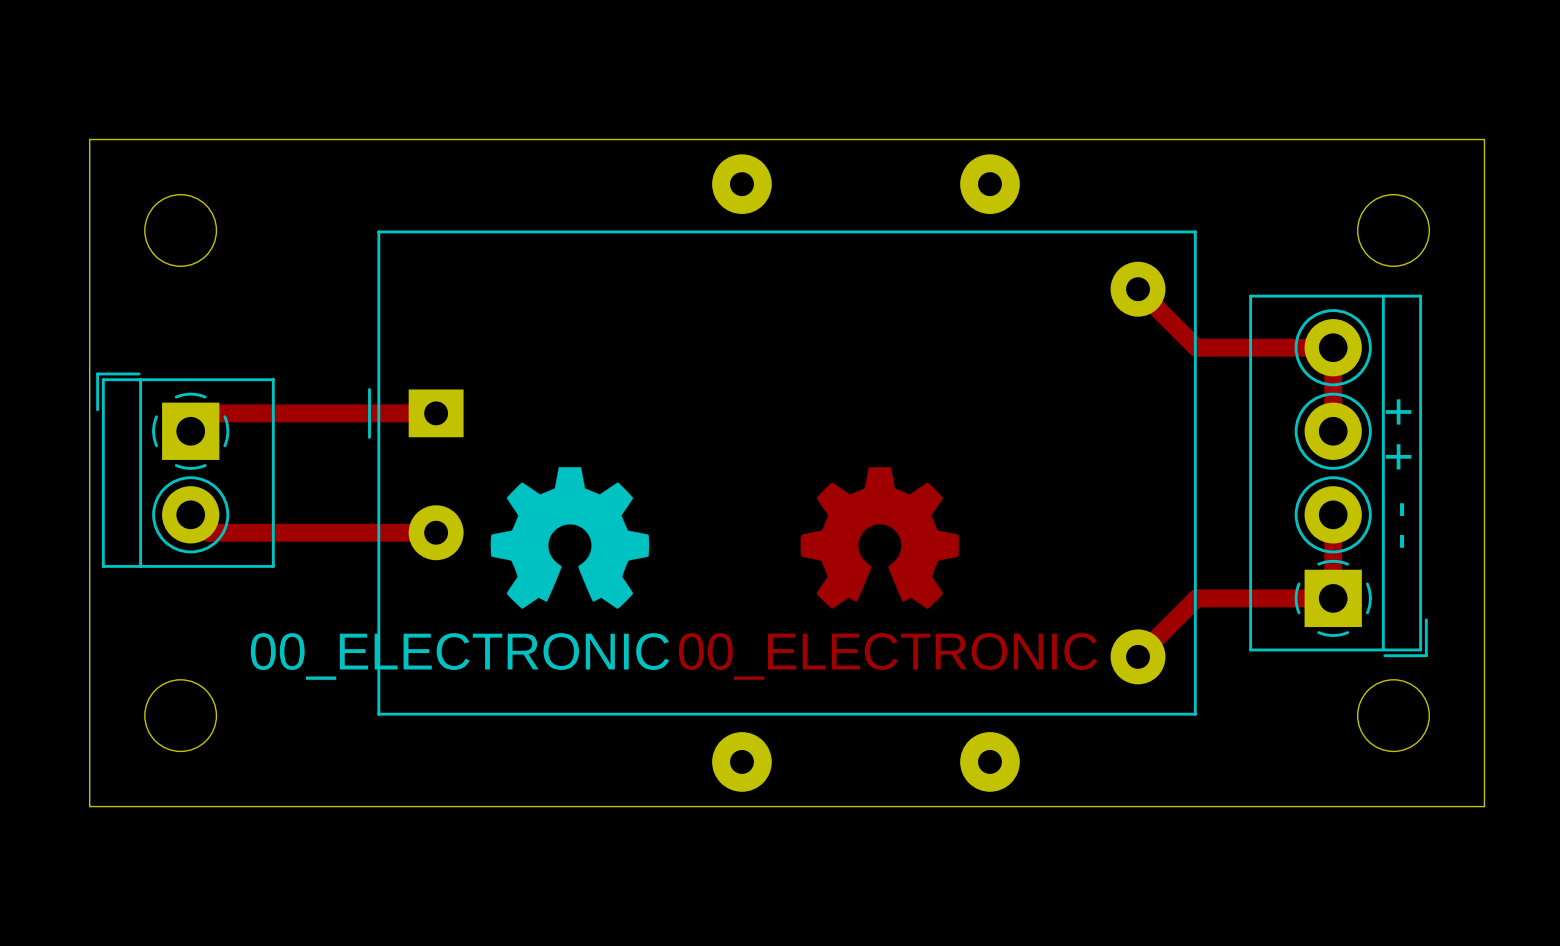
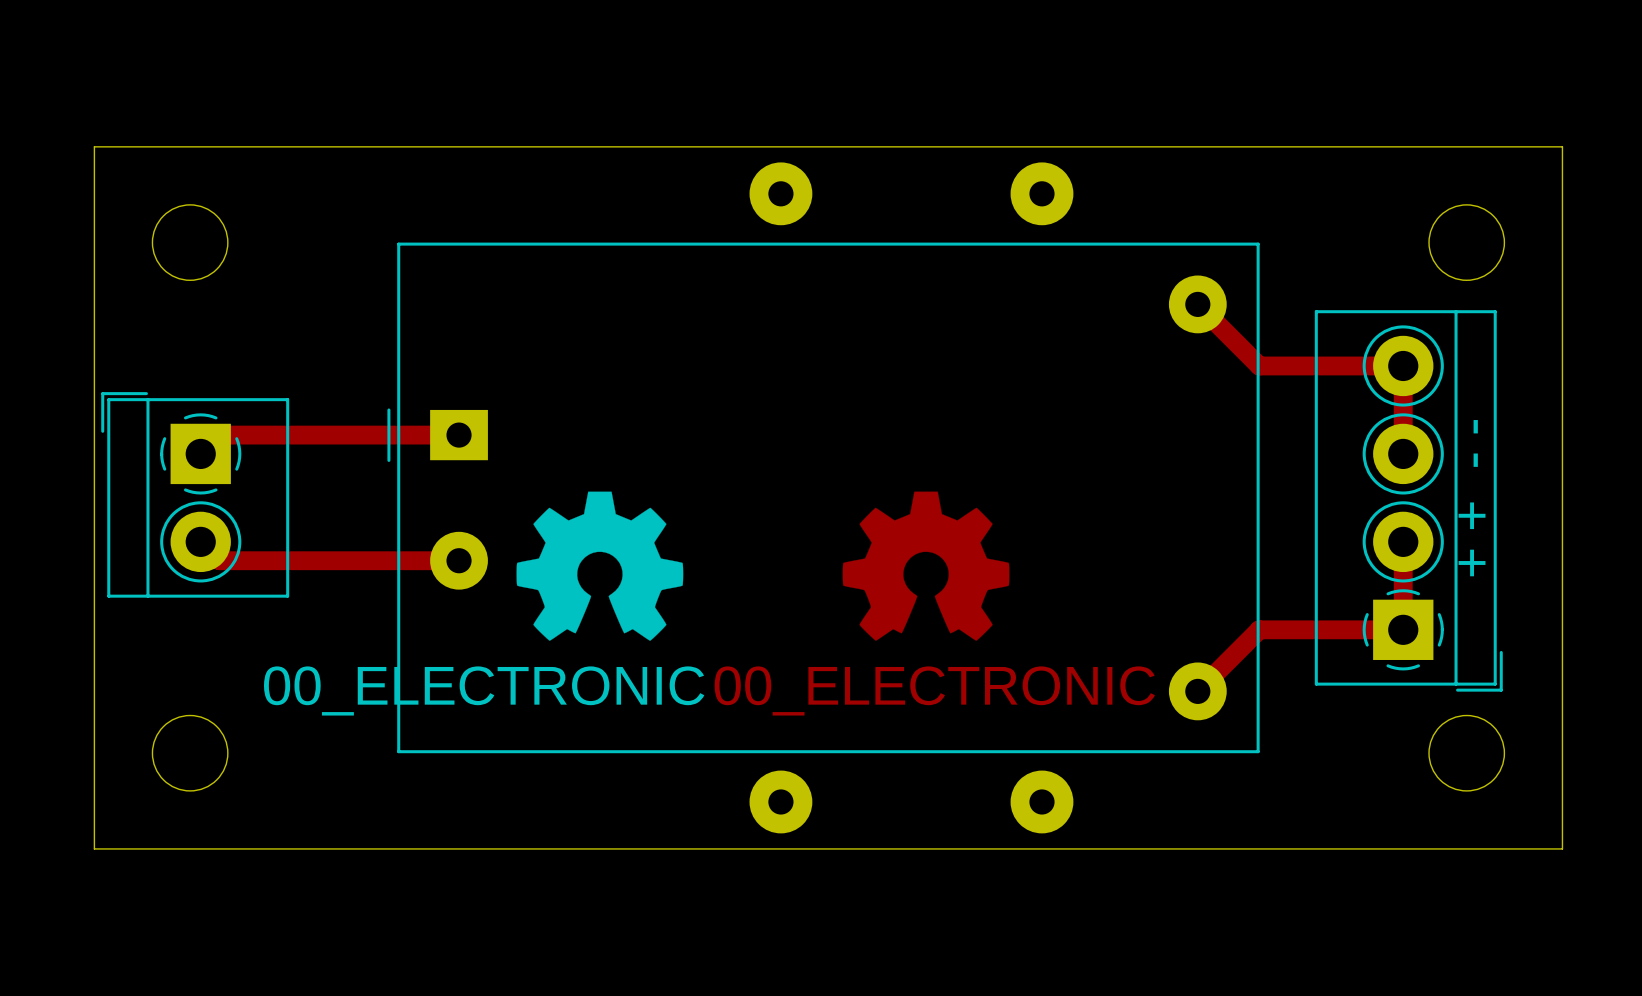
text: - - + + (1398, 473) -> + + - - (1472, 498)

